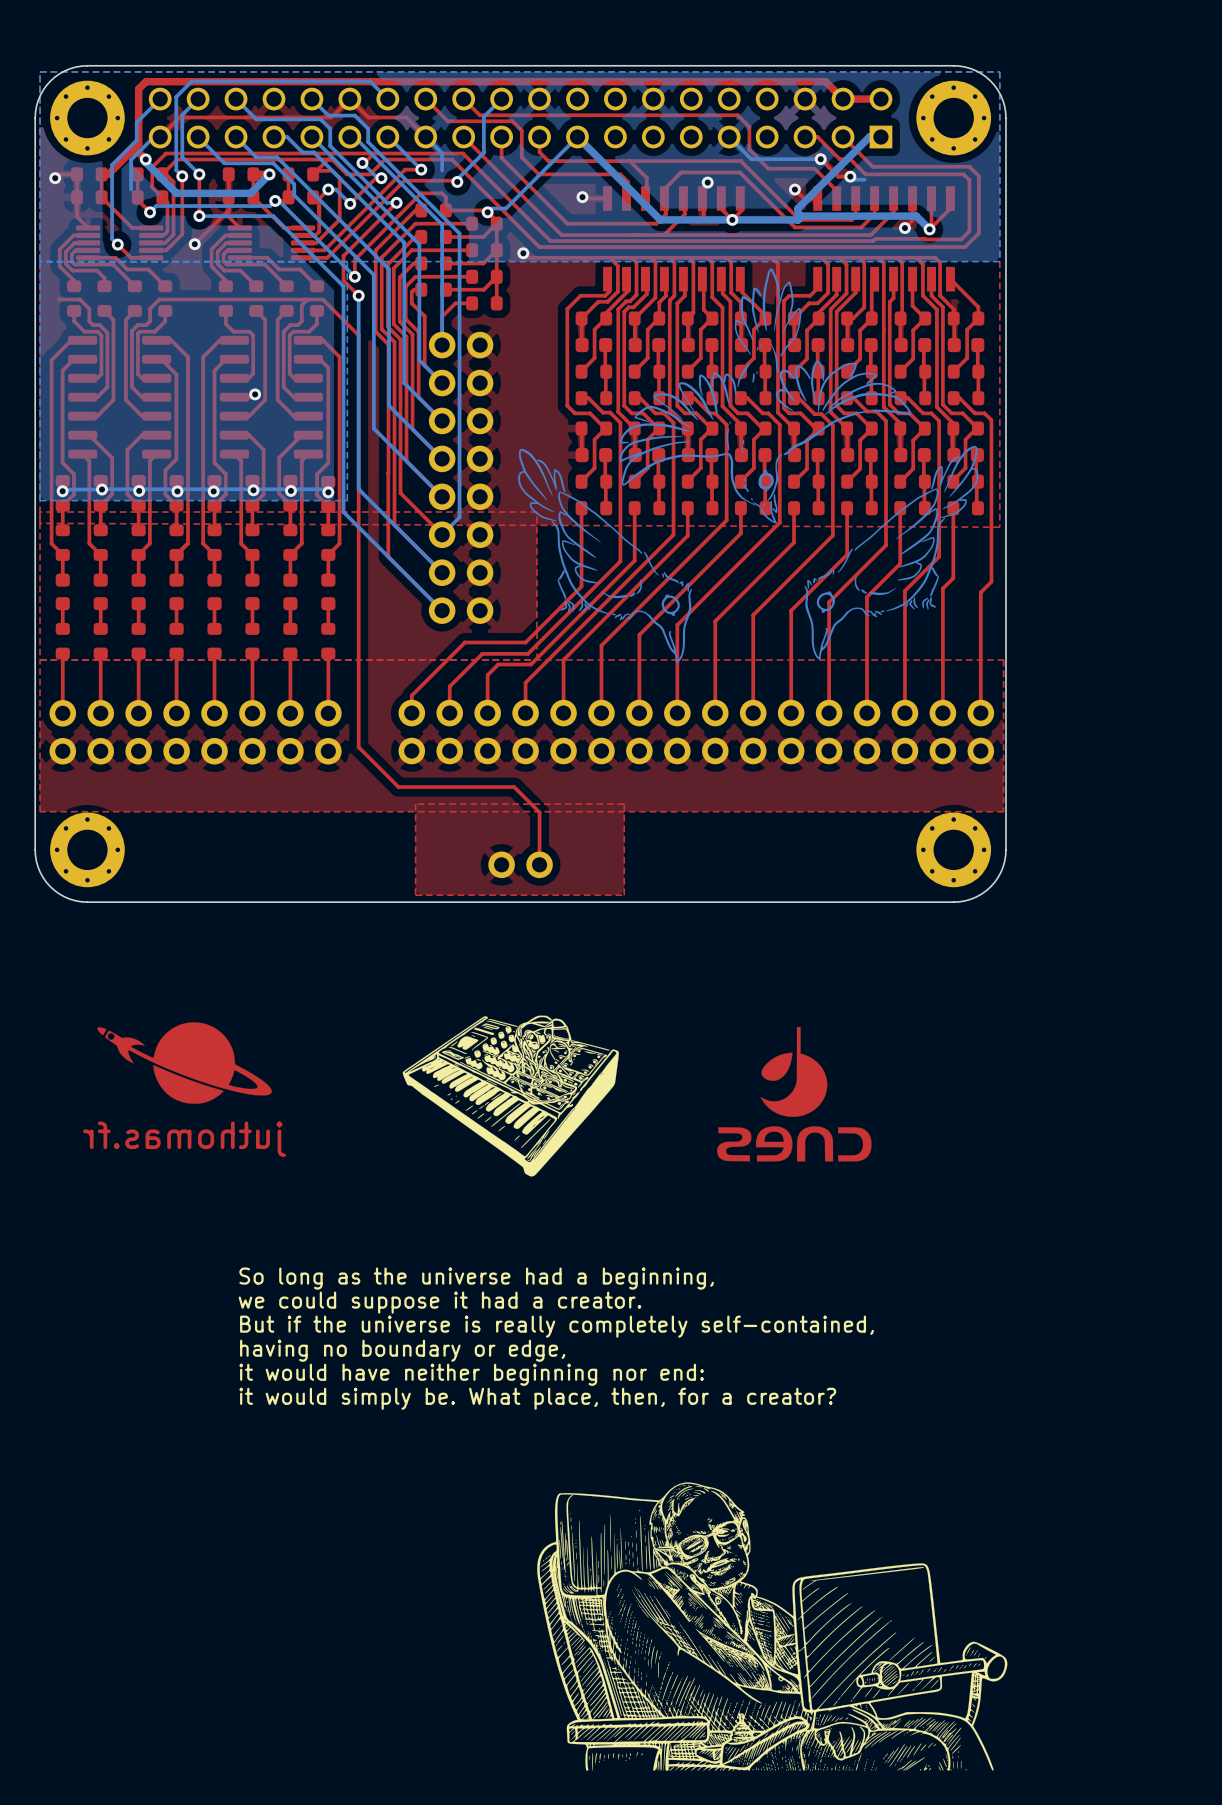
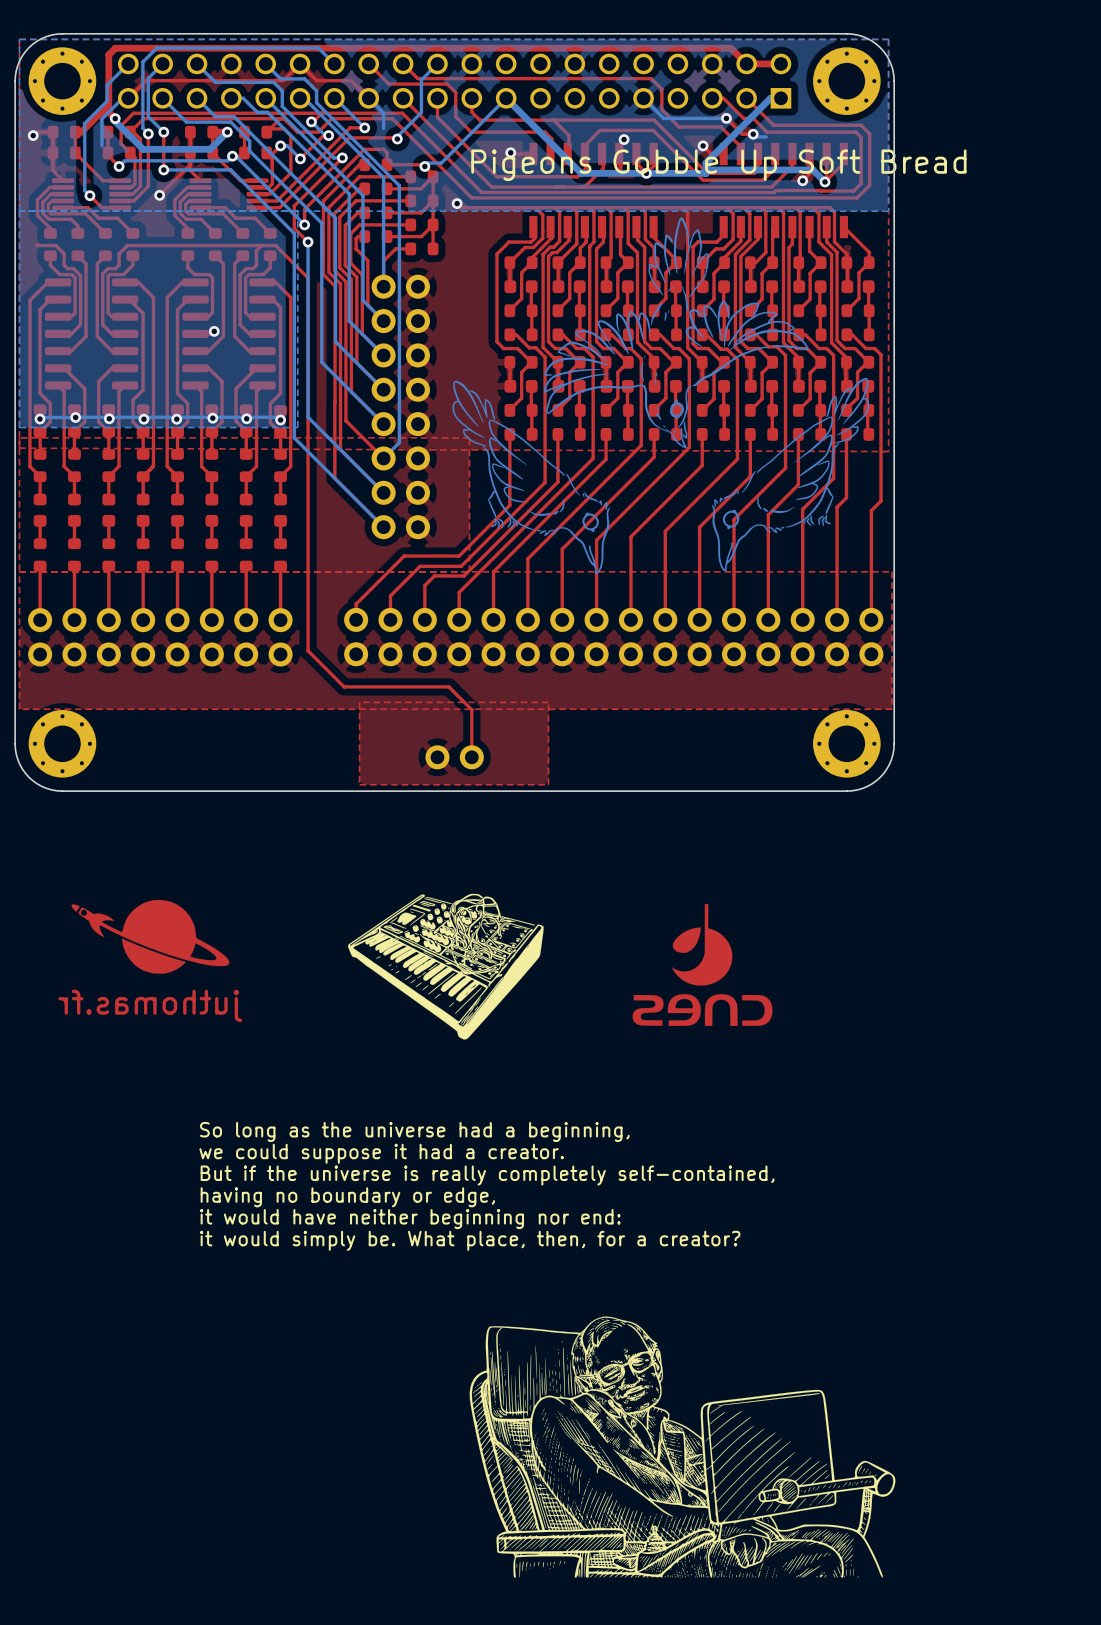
text: none -> Pigeons Gobble Up Soft Bread (718, 165)

